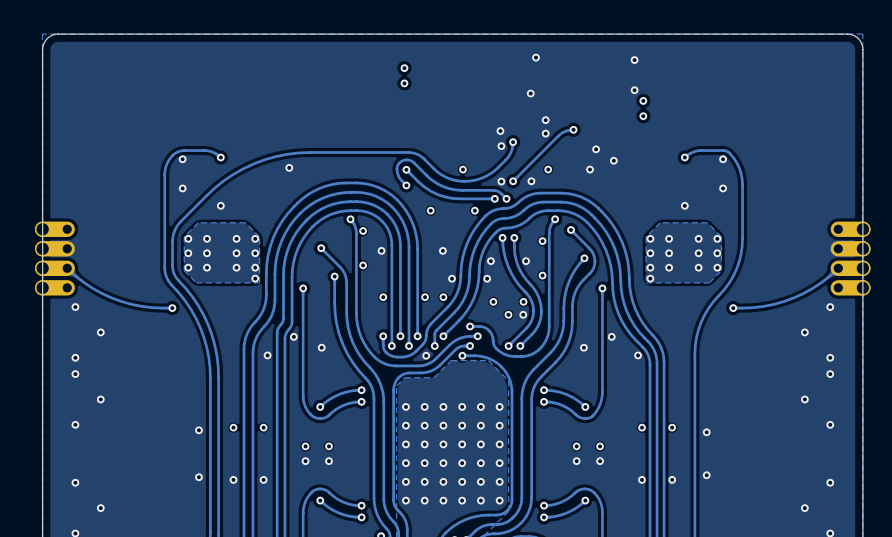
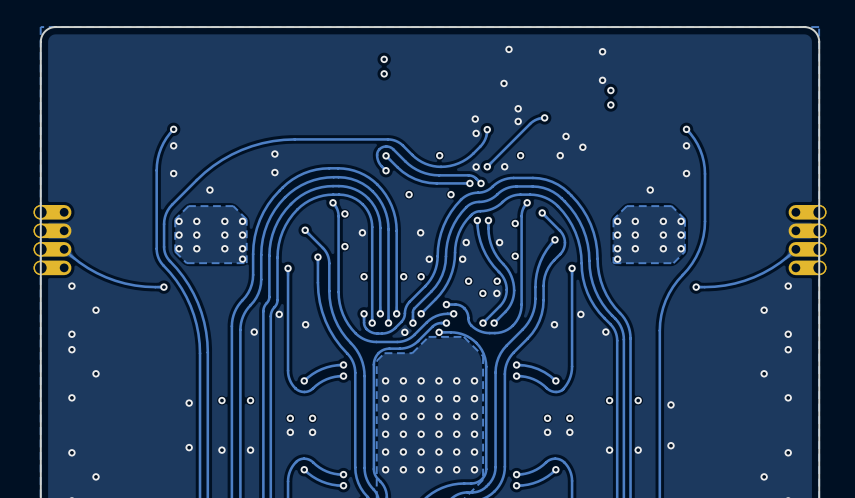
via: none -> (173, 129)
track: (220, 157) (206, 150) (178, 151) (172, 155) (166, 164) (164, 185) -> (173, 129) (161, 148) (156, 170)
via: (220, 157) -> none
track: (684, 157) (699, 150) (727, 151) (739, 167) (742, 188) -> (686, 129) (700, 149) (705, 173)
via position: (684, 157) -> (686, 129)
via: none -> (274, 172)

